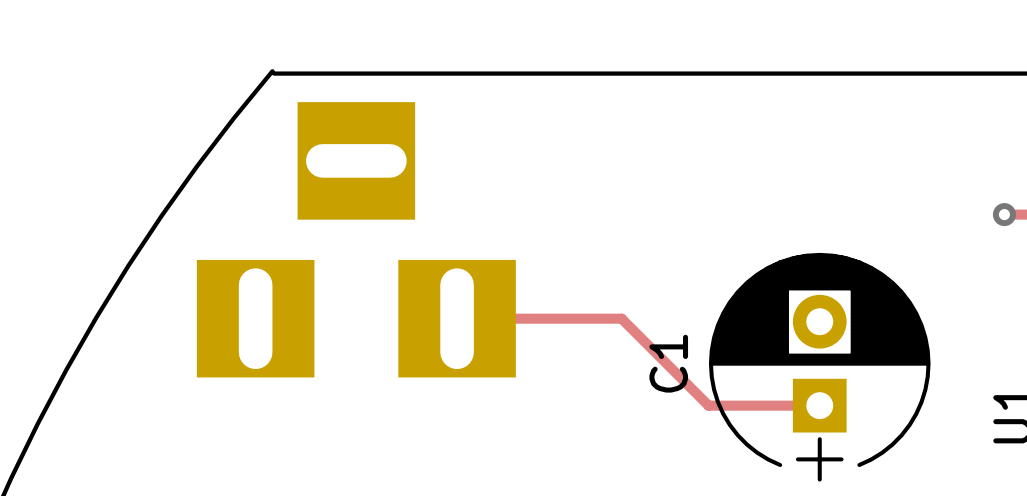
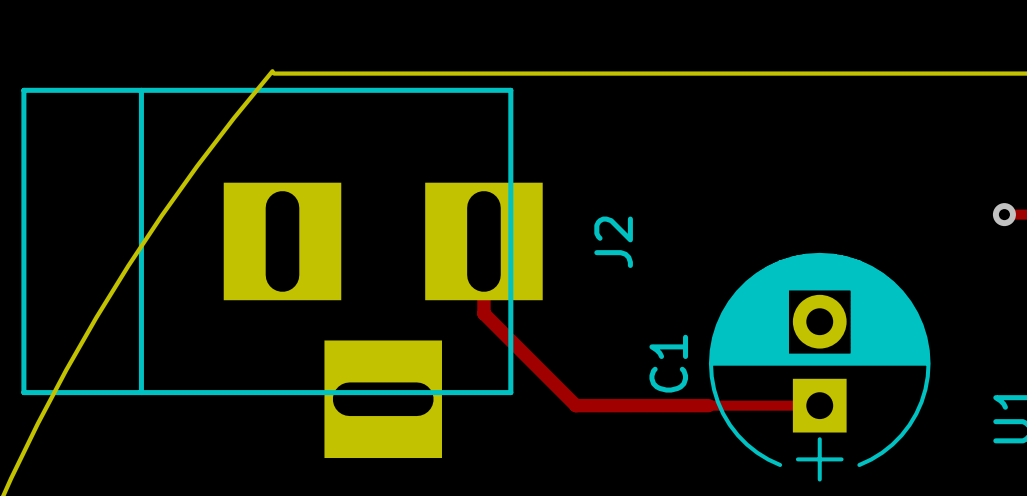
J2 side: bottom (356, 239) -> top (282, 272)
track: (457, 318) (621, 318) (708, 405) -> (483, 241) (483, 313) (575, 405) (708, 405)

